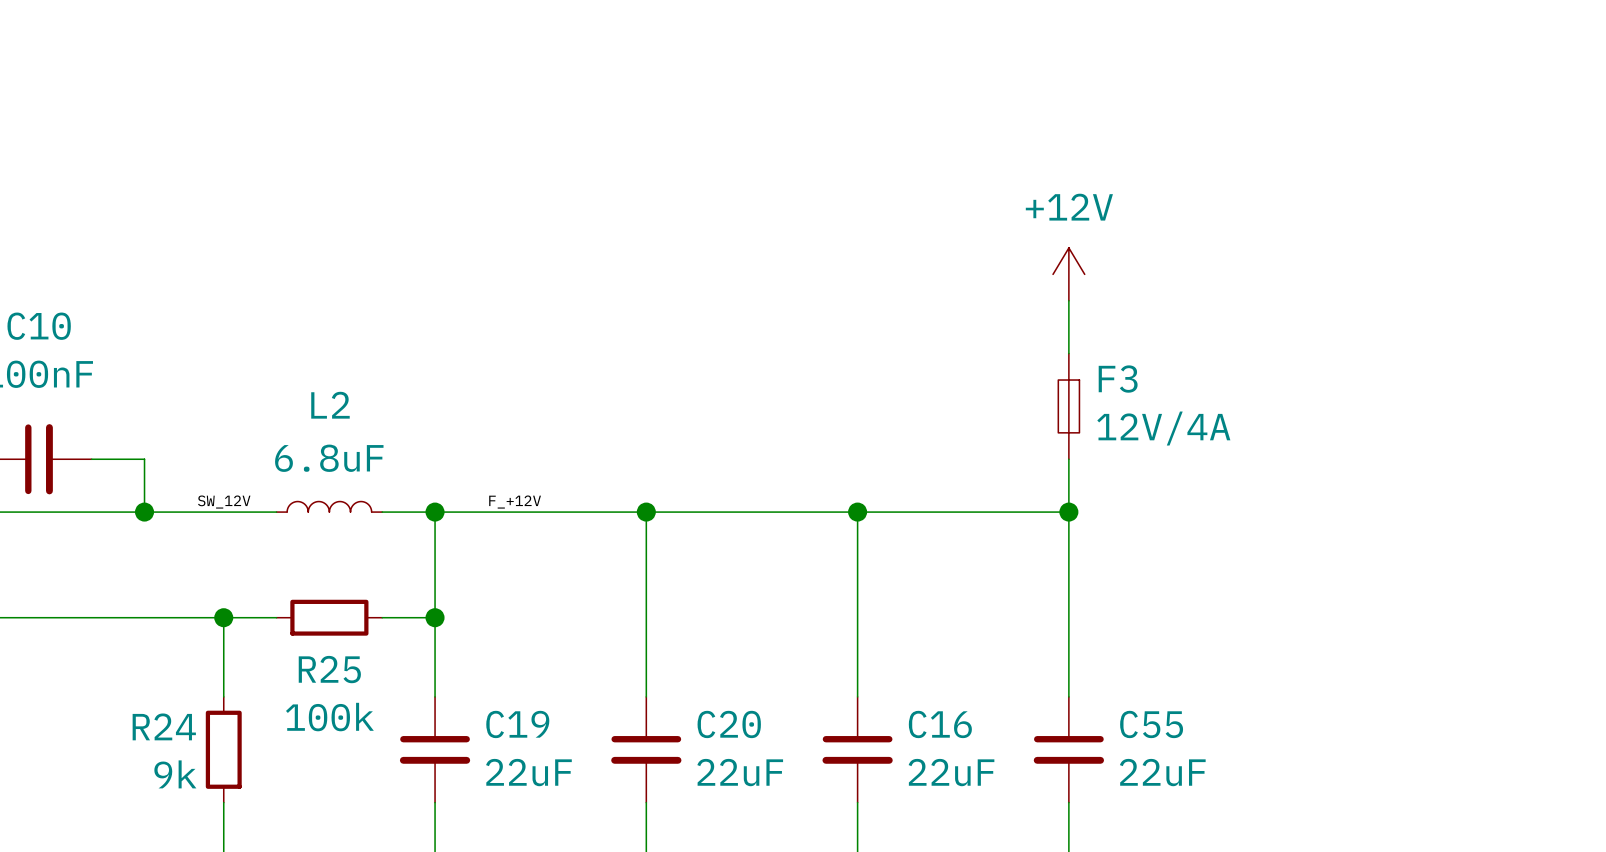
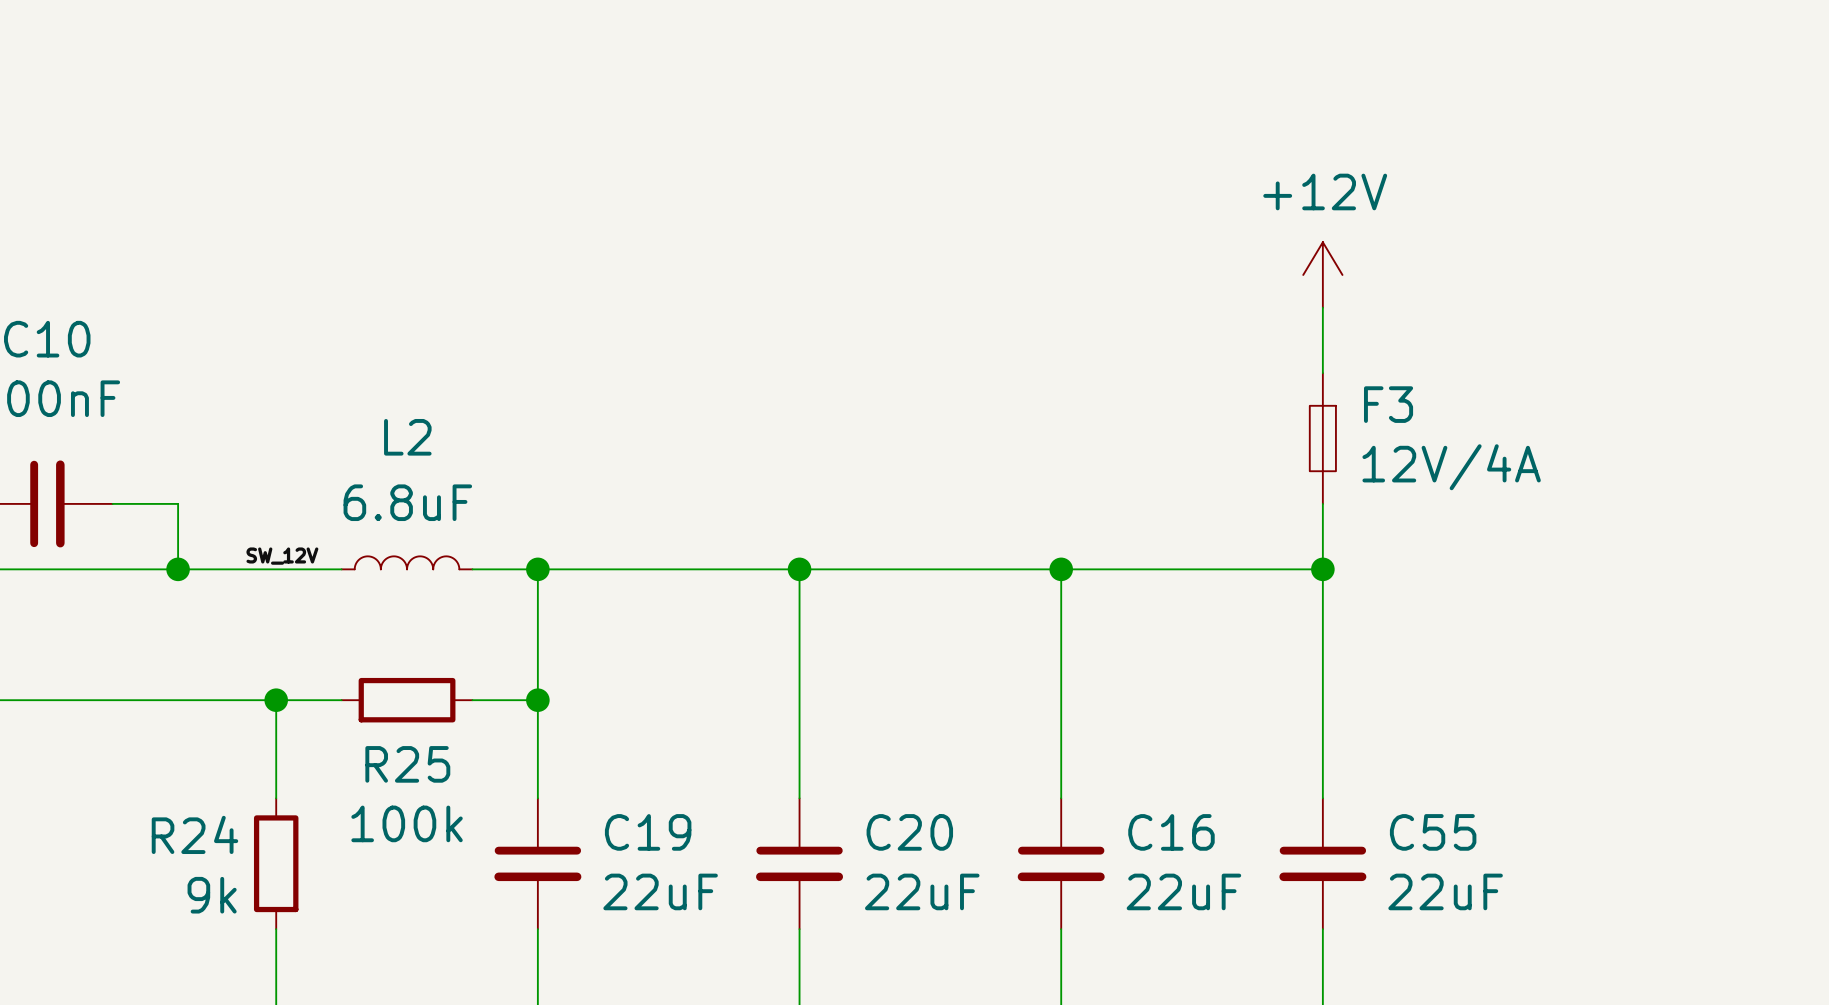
label: F_+12V (515, 502) -> none

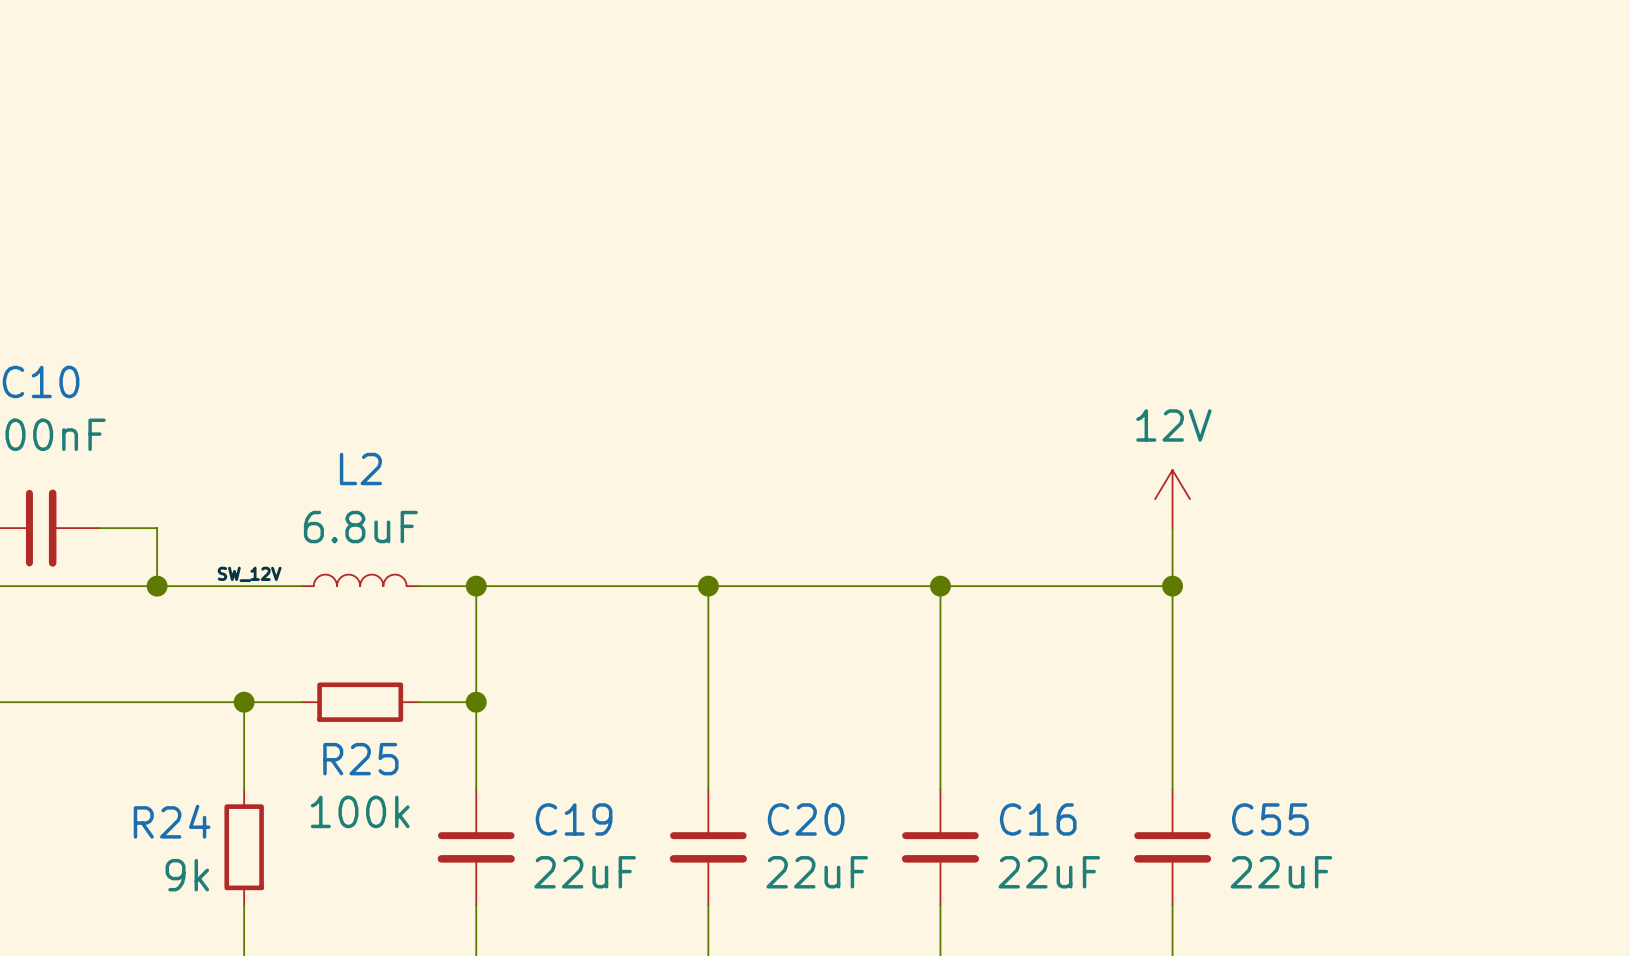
power symbol: +12V (1322, 274) -> none
wire: (1322, 307) (1322, 373) -> none
F3: 12V/4A (1322, 438) -> none
power symbol: none -> 12V (1172, 499)

